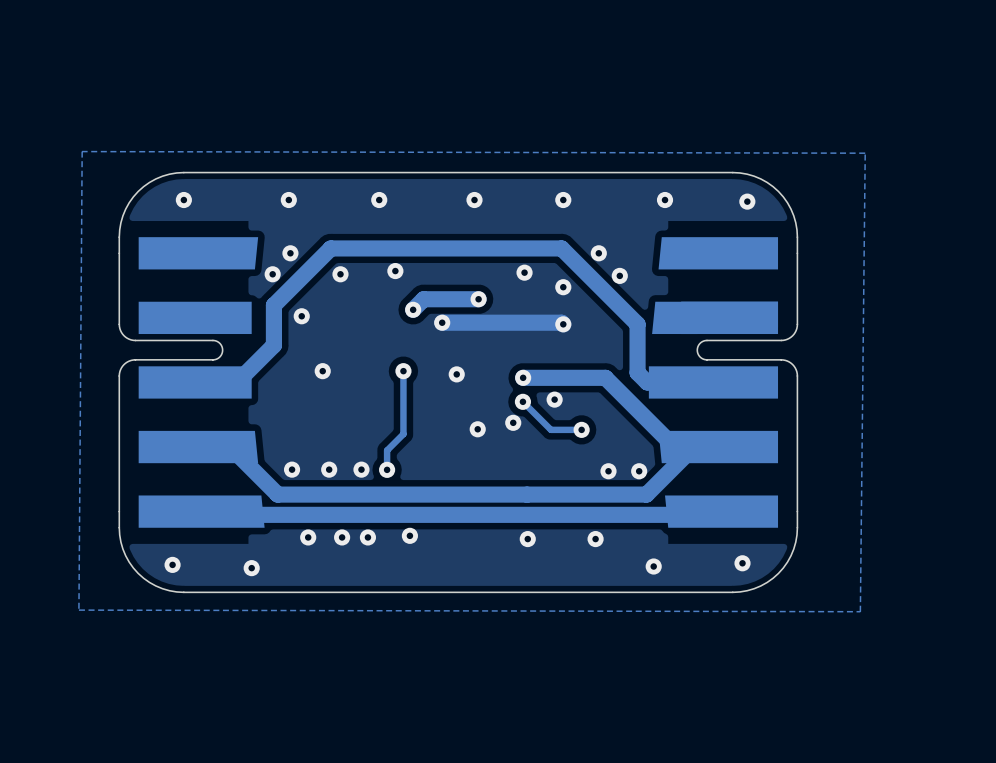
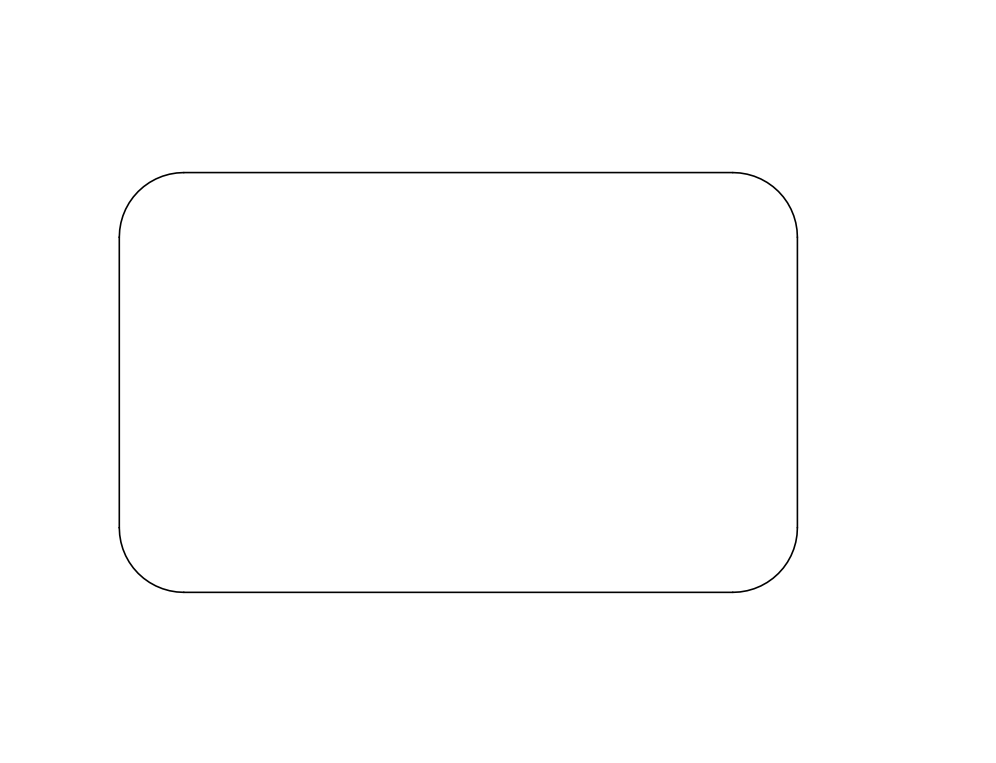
zone outline: (82, 151) (865, 153) (860, 611) (78, 610) (82, 151) -> none
via: (183, 200) -> none
via: (288, 200) -> none
via: (379, 200) -> none
via: (474, 200) -> none
via: (563, 200) -> none
via: (665, 200) -> none
via: (747, 201) -> none
board edge: none -> (119, 253) (119, 511)
via: (290, 253) -> none
via: (598, 253) -> none
board edge: none -> (797, 253) (797, 511)
via: (395, 271) -> none
via: (524, 272) -> none
via: (272, 274) -> none
via: (340, 274) -> none
via: (619, 275) -> none
via: (563, 287) -> none
track: (478, 299) (423, 299) (413, 309) -> none
via: (478, 299) -> none
via: (413, 309) -> none
via: (301, 316) -> none
track: (442, 322) (561, 322) (563, 324) -> none
via: (442, 322) -> none
via: (563, 324) -> none
via: (322, 371) -> none
track: (403, 371) (403, 434) (387, 450) (387, 469) -> none
via: (403, 371) -> none
via: (456, 374) -> none
track: (523, 377) (605, 377) (674, 447) (719, 447) -> none
via: (523, 377) -> none
part: (191, 382) -> none
track: (713, 382) (647, 382) (637, 372) (637, 324) (561, 248) (330, 248) (273, 305) (273, 345) (236, 382) (195, 382) -> none
part: (723, 382) -> none
via: (554, 399) -> none
track: (522, 401) (550, 429) (581, 429) -> none
via: (522, 401) -> none
via: (513, 422) -> none
via: (477, 429) -> none
via: (581, 429) -> none
track: (694, 447) (646, 494) (277, 494) (230, 447) (196, 447) -> none
via: (292, 469) -> none
via: (329, 469) -> none
via: (361, 469) -> none
via: (387, 469) -> none
via: (608, 471) -> none
via: (639, 471) -> none
track: (723, 511) (719, 514) (203, 514) (200, 511) -> none
via: (409, 535) -> none
via: (308, 537) -> none
via: (342, 537) -> none
via: (367, 537) -> none
via: (527, 539) -> none
via: (595, 539) -> none
via: (742, 563) -> none
via: (172, 564) -> none
via: (653, 566) -> none
via: (251, 568) -> none

